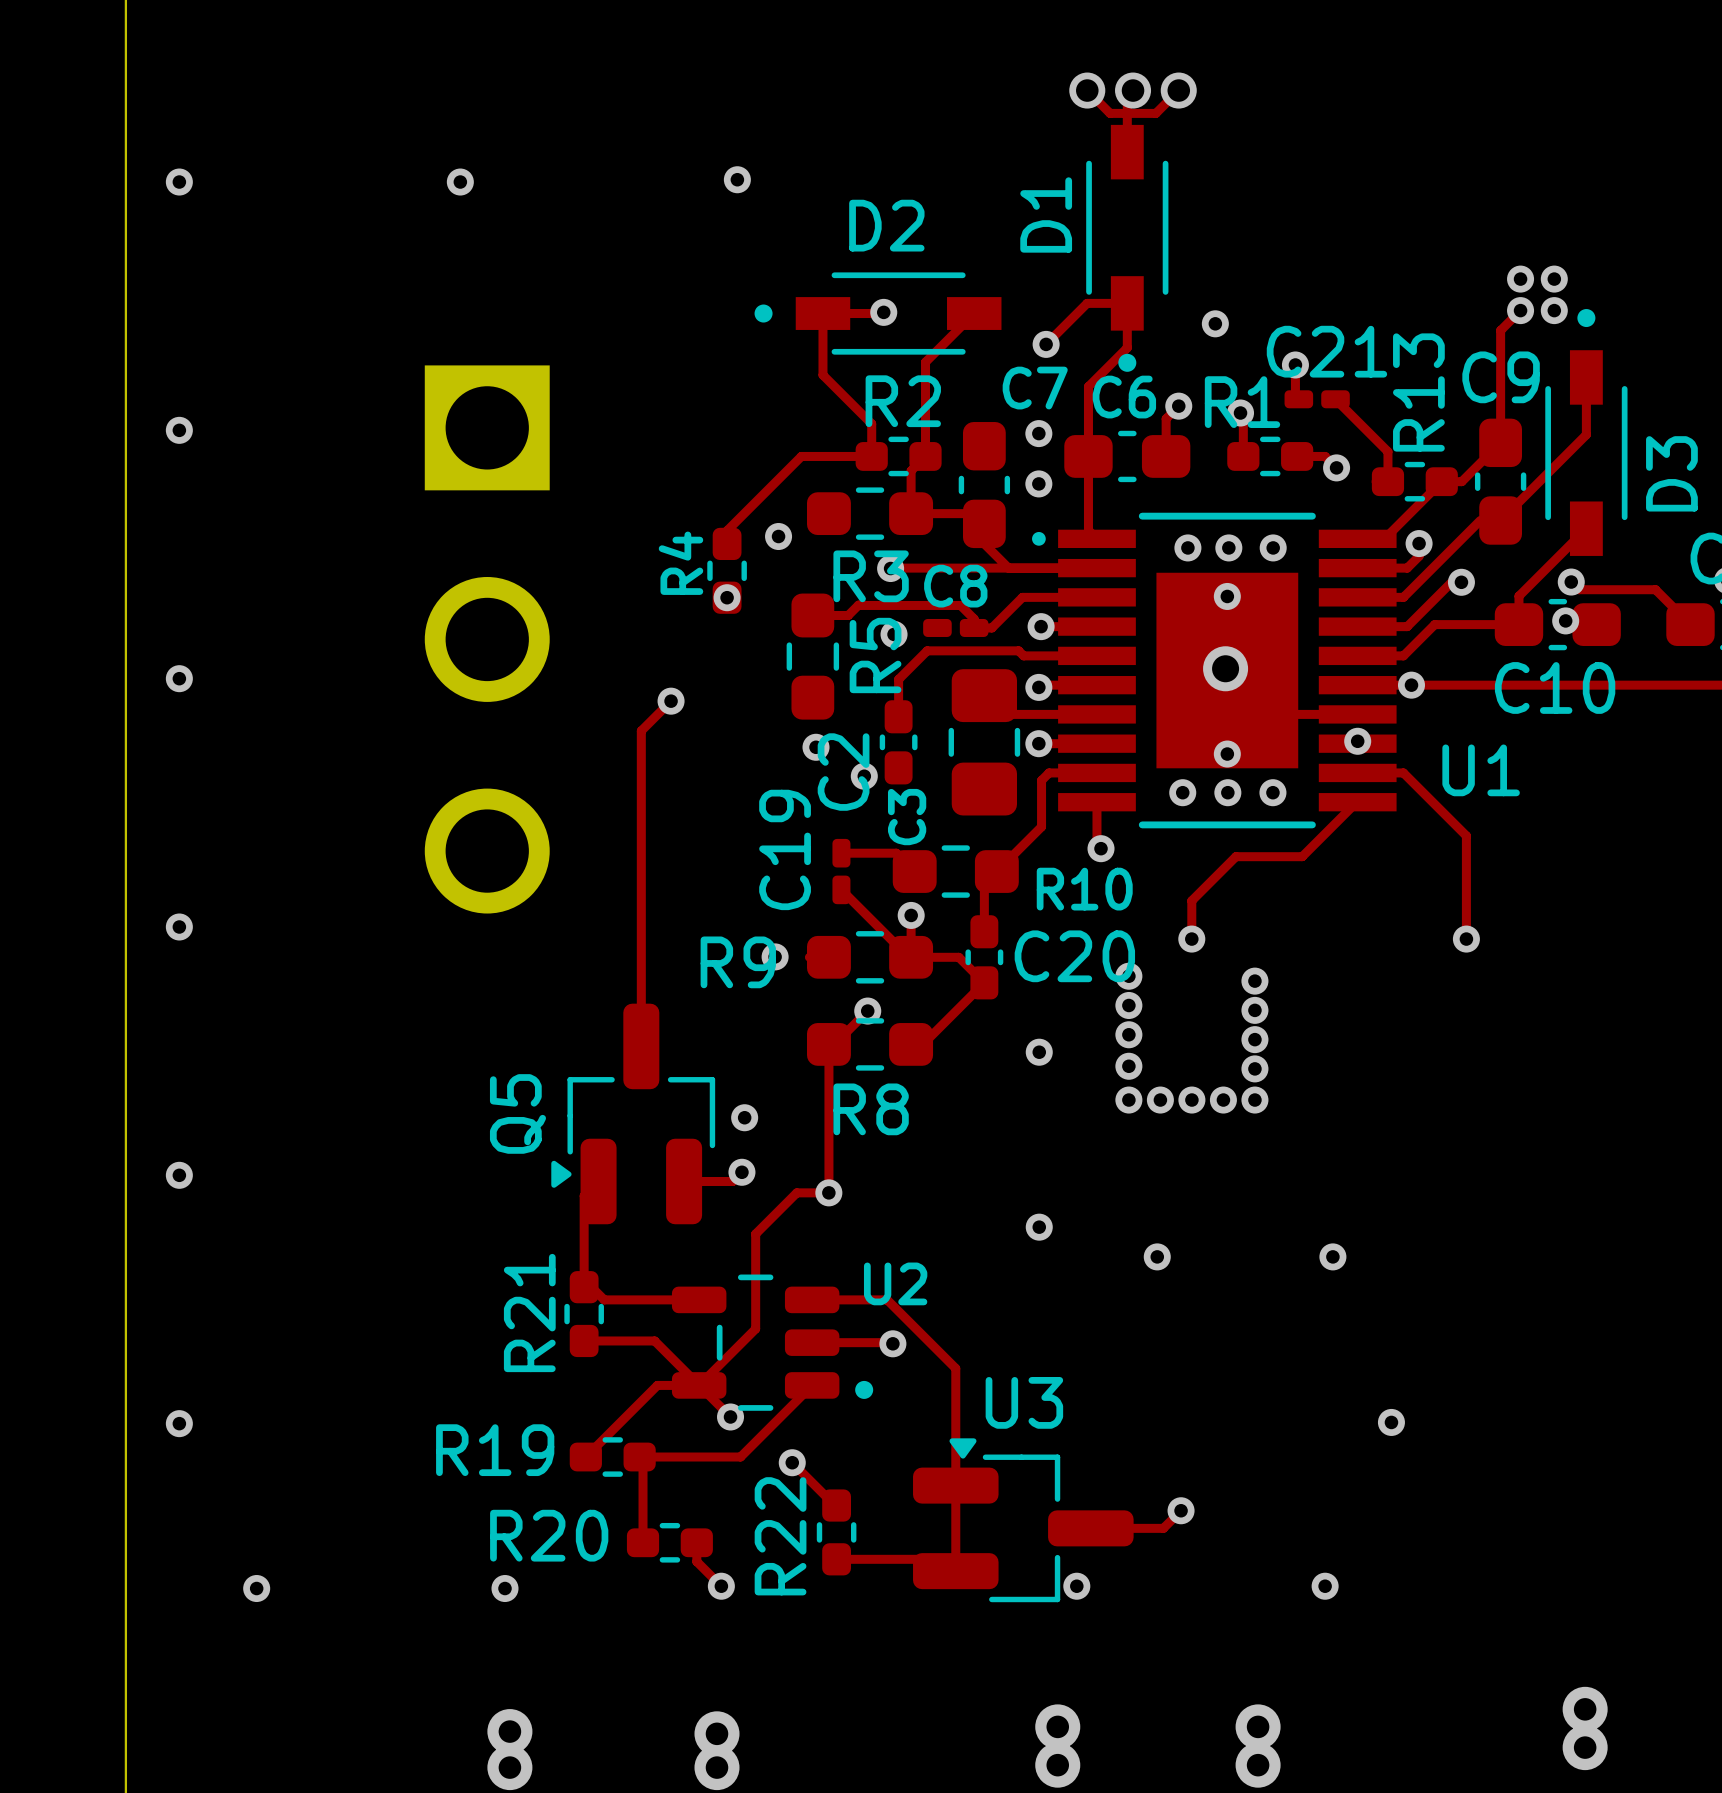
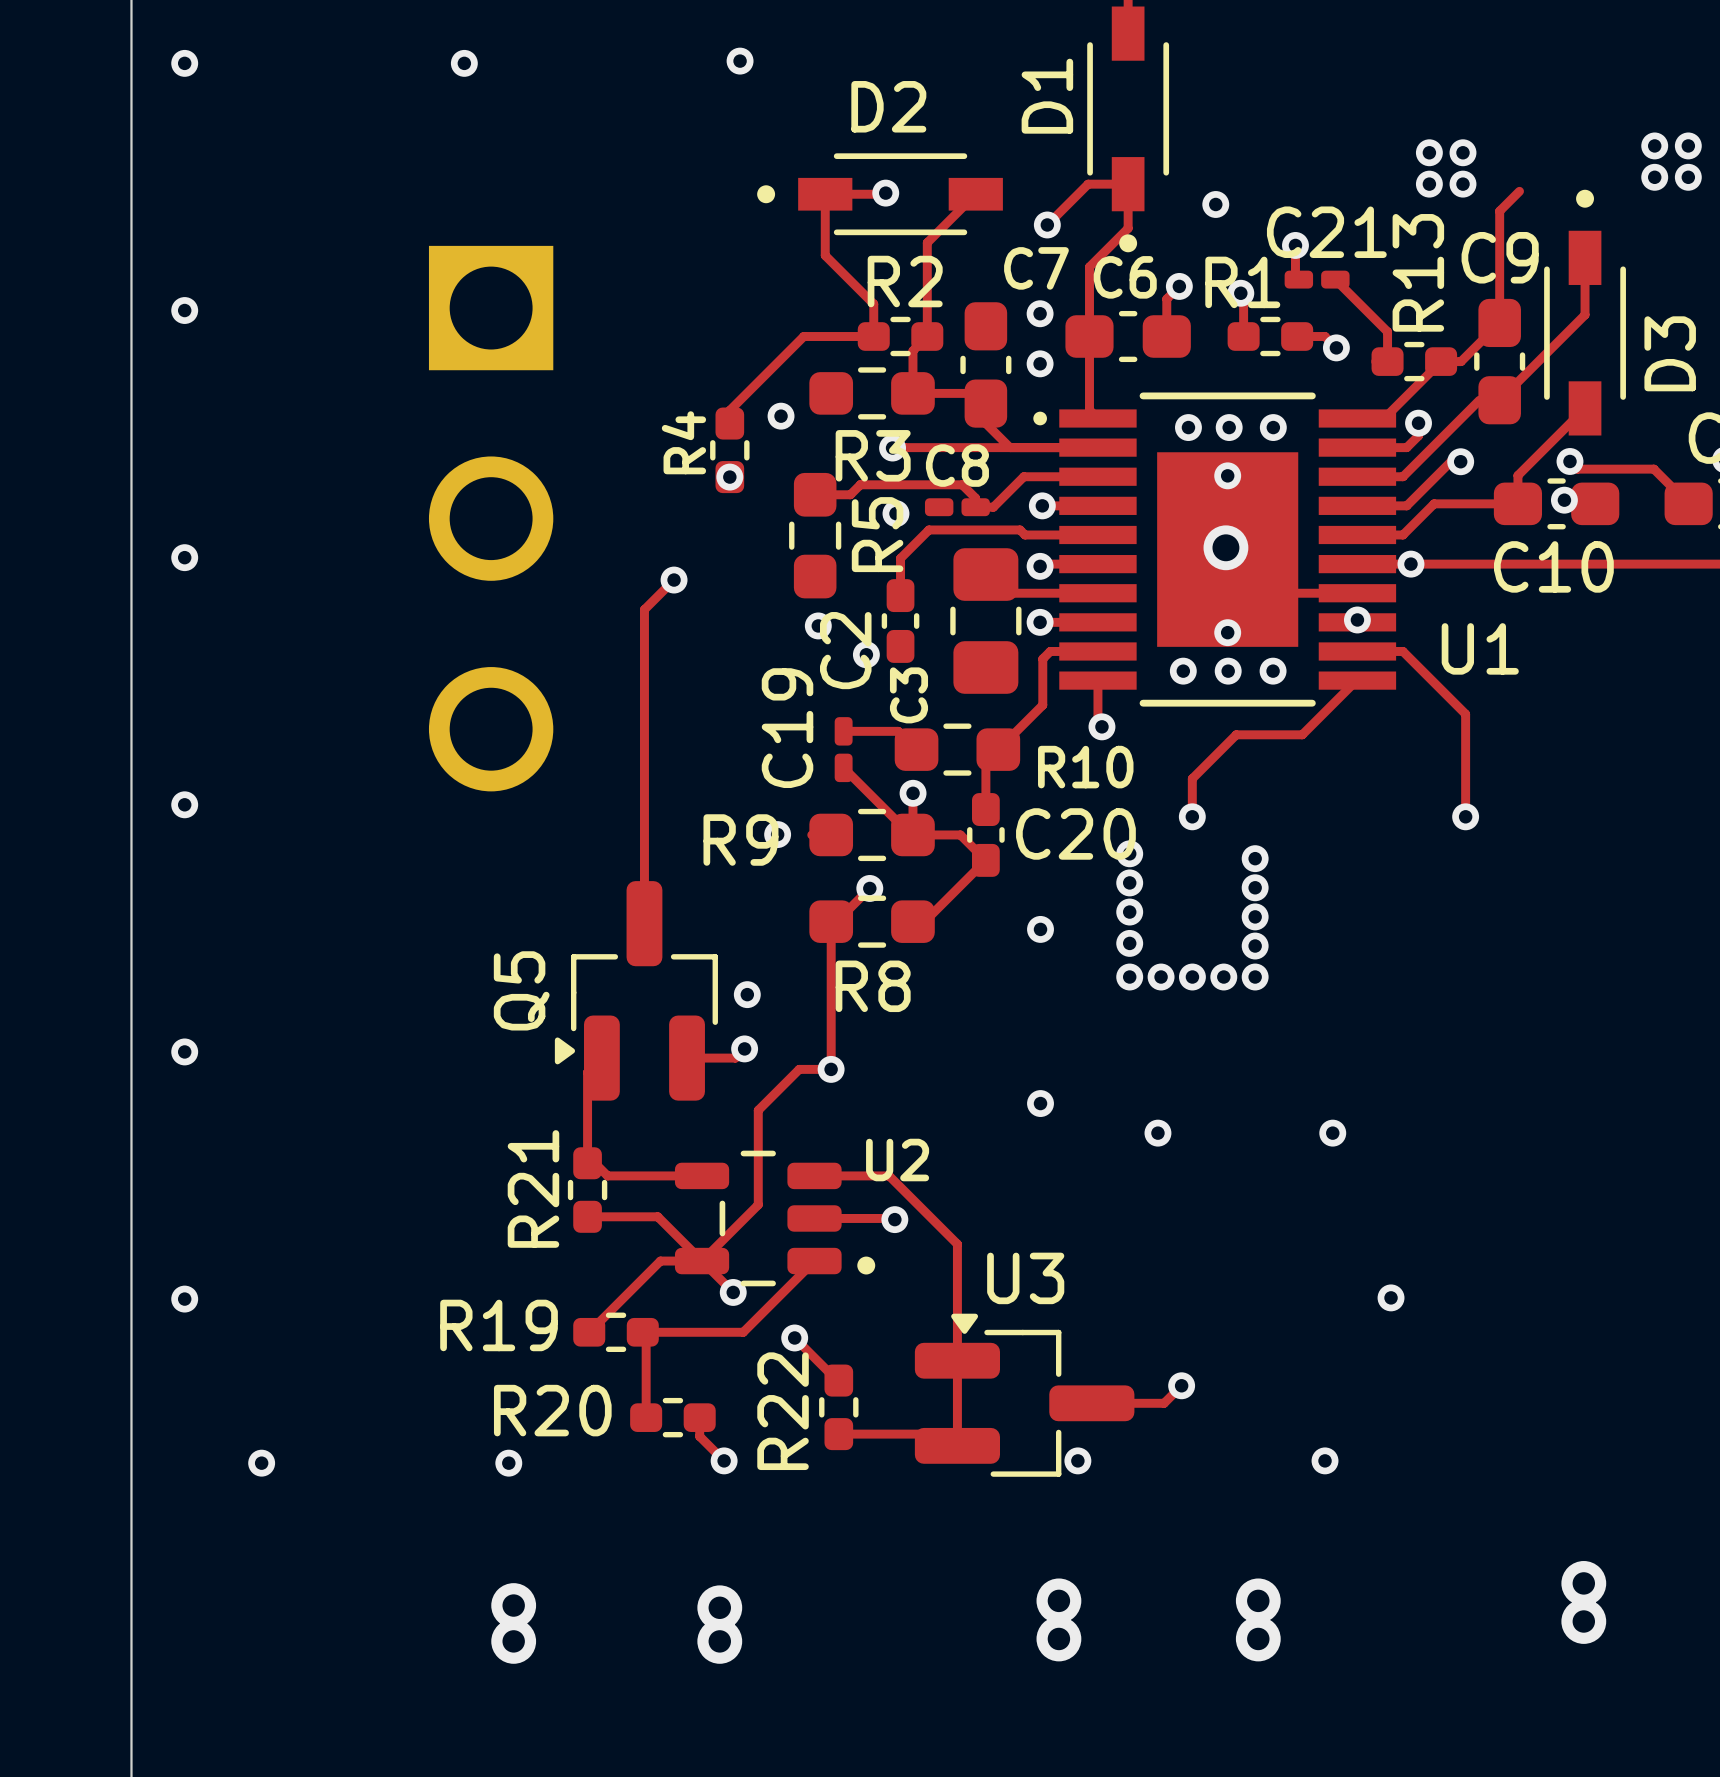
via: none -> (1654, 145)
via: none -> (1688, 145)
via: none -> (1429, 152)
via: none -> (1462, 152)
via: (1520, 279) -> none
via: (1554, 279) -> none
via: none -> (1654, 177)
via: none -> (1688, 177)
via: none -> (1429, 184)
via: none -> (1462, 184)
via: (1520, 310) -> none
via: (1554, 310) -> none

